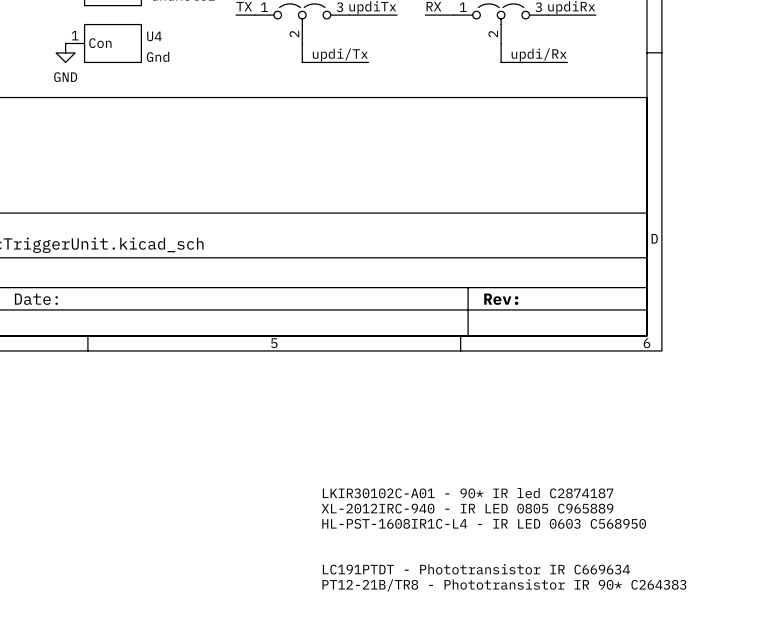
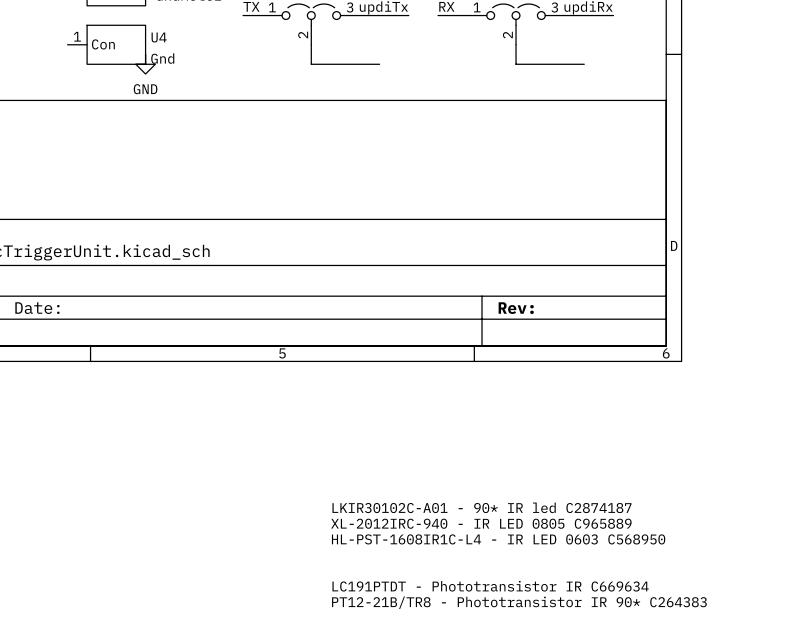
power symbol position: GND (65, 52) -> GND (145, 64)
label: updi/Tx (340, 54) -> none
label: updi/Rx (539, 54) -> none

